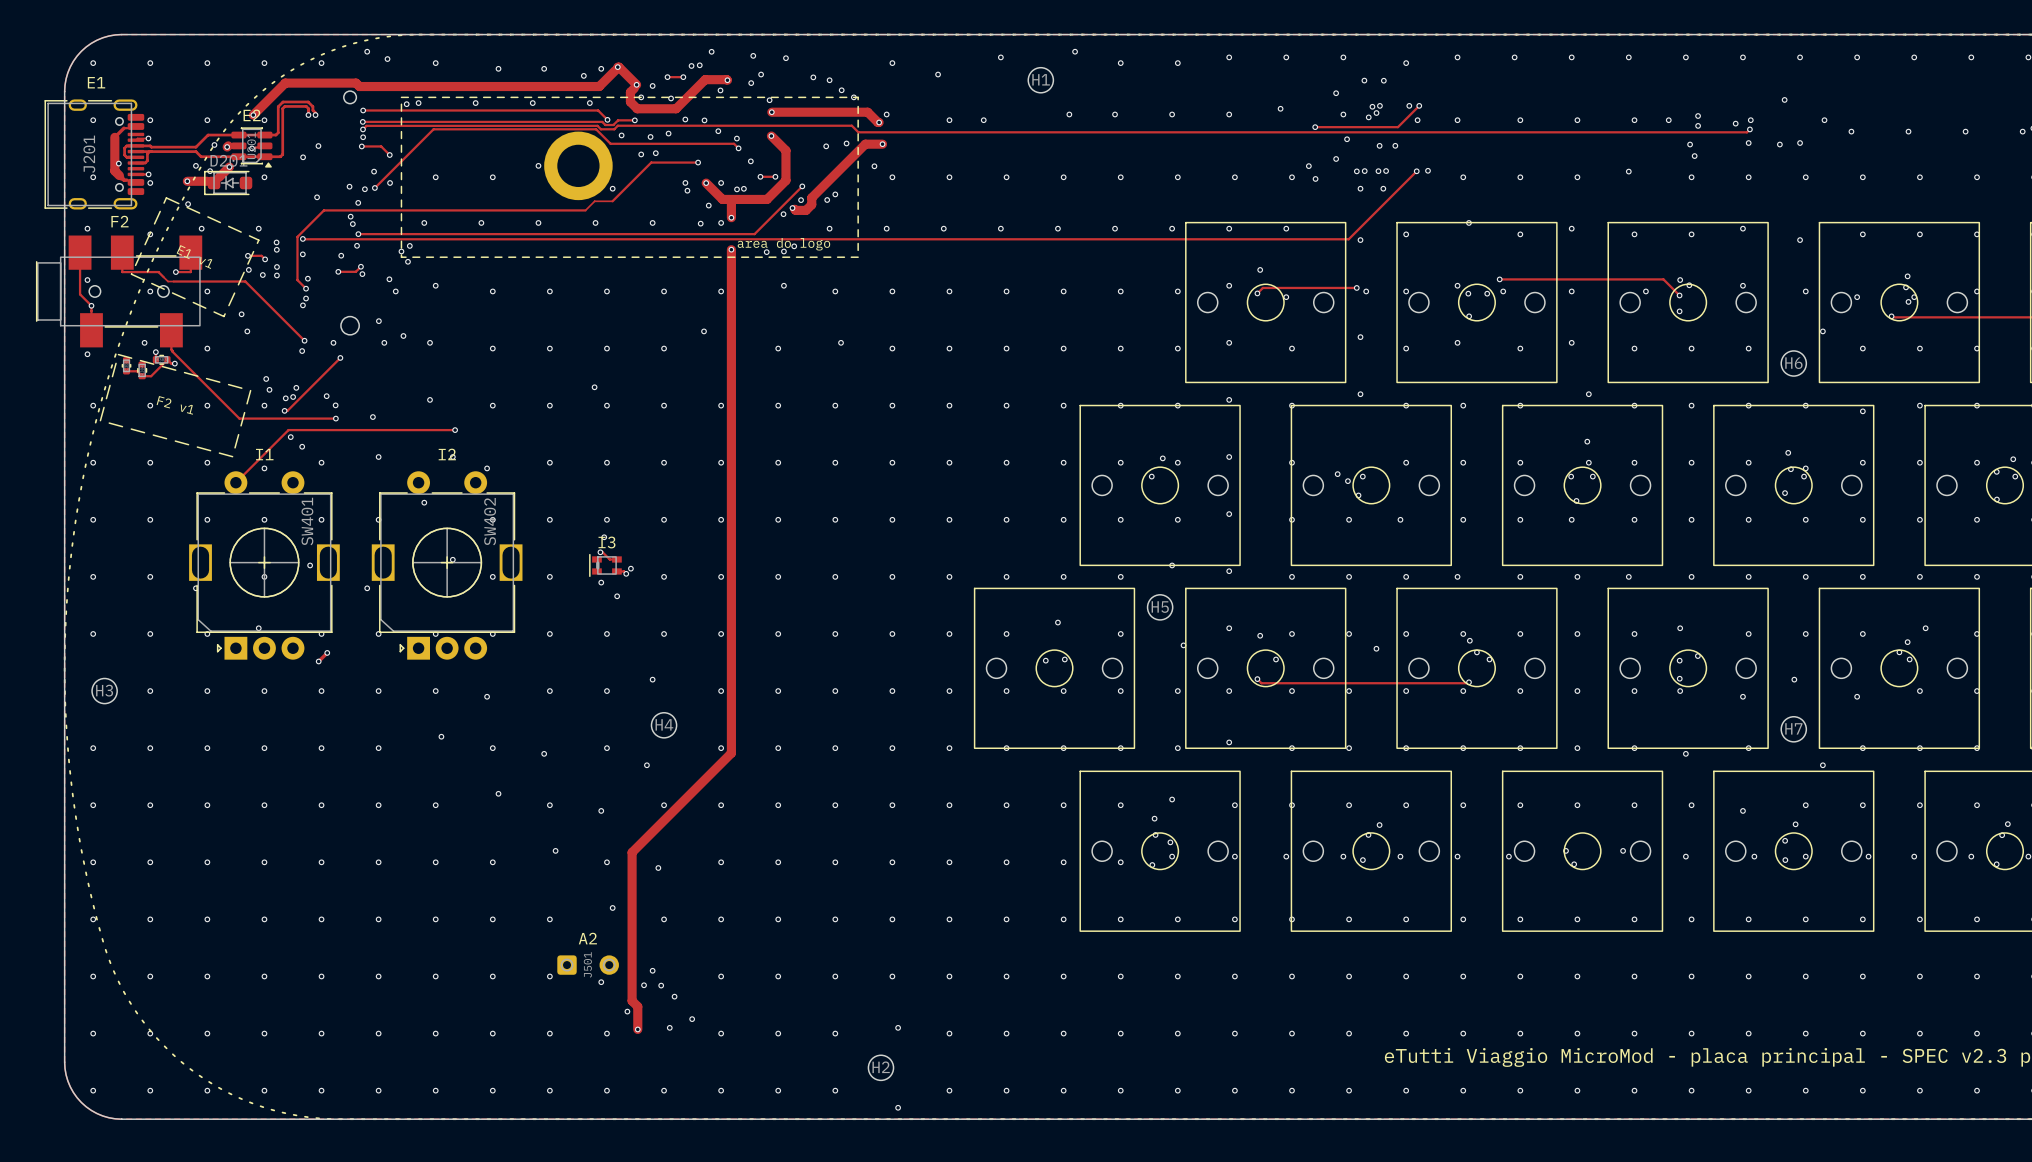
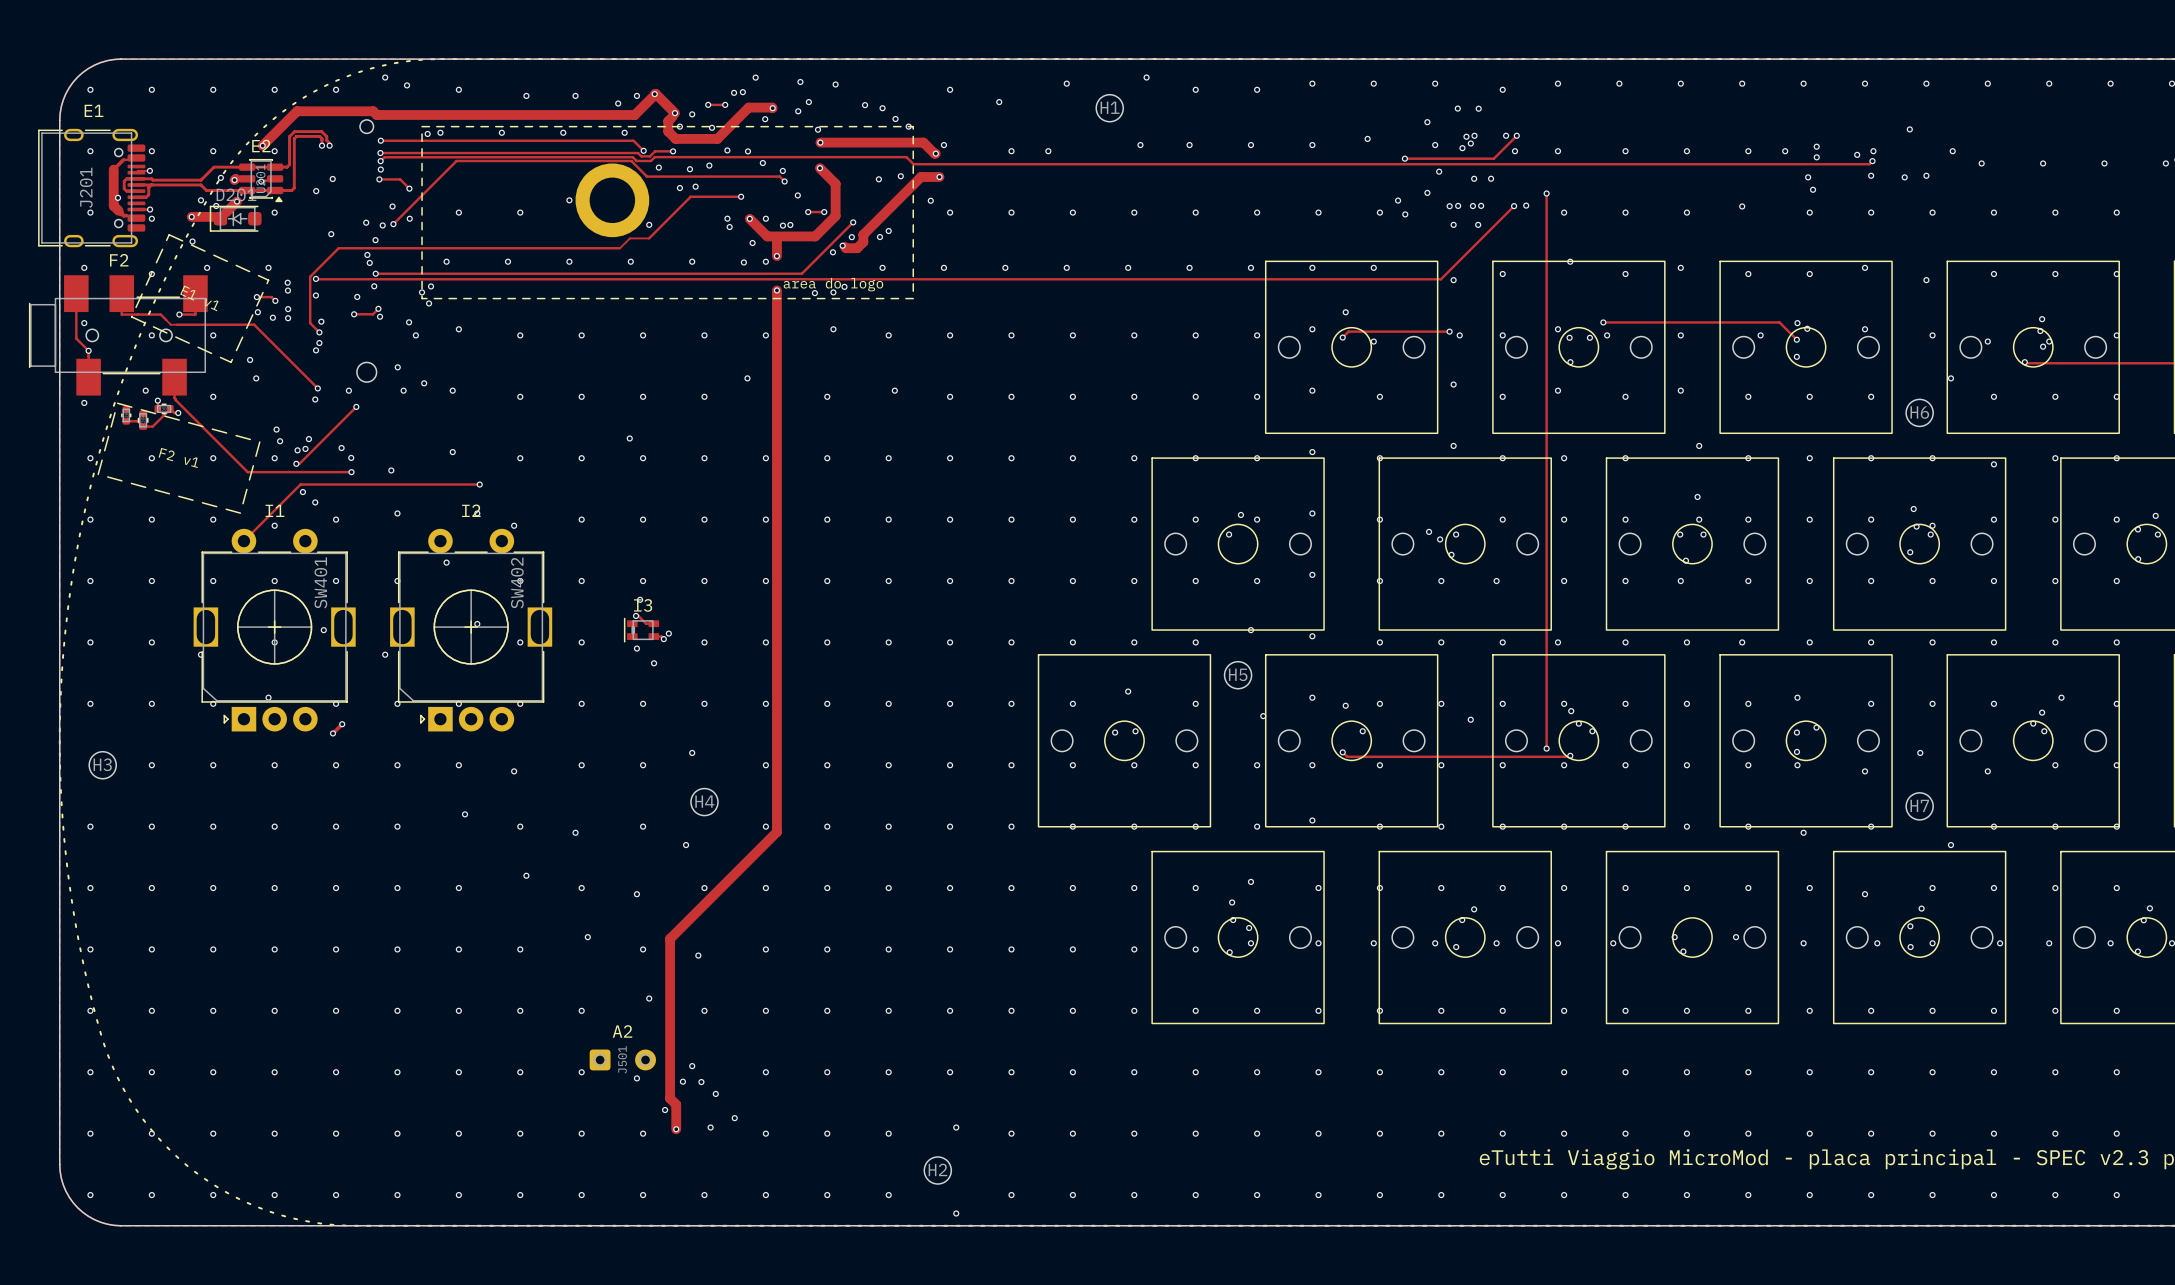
track: none -> (1546, 193) (1546, 748)
via: none -> (1546, 193)
via: none -> (1546, 748)

